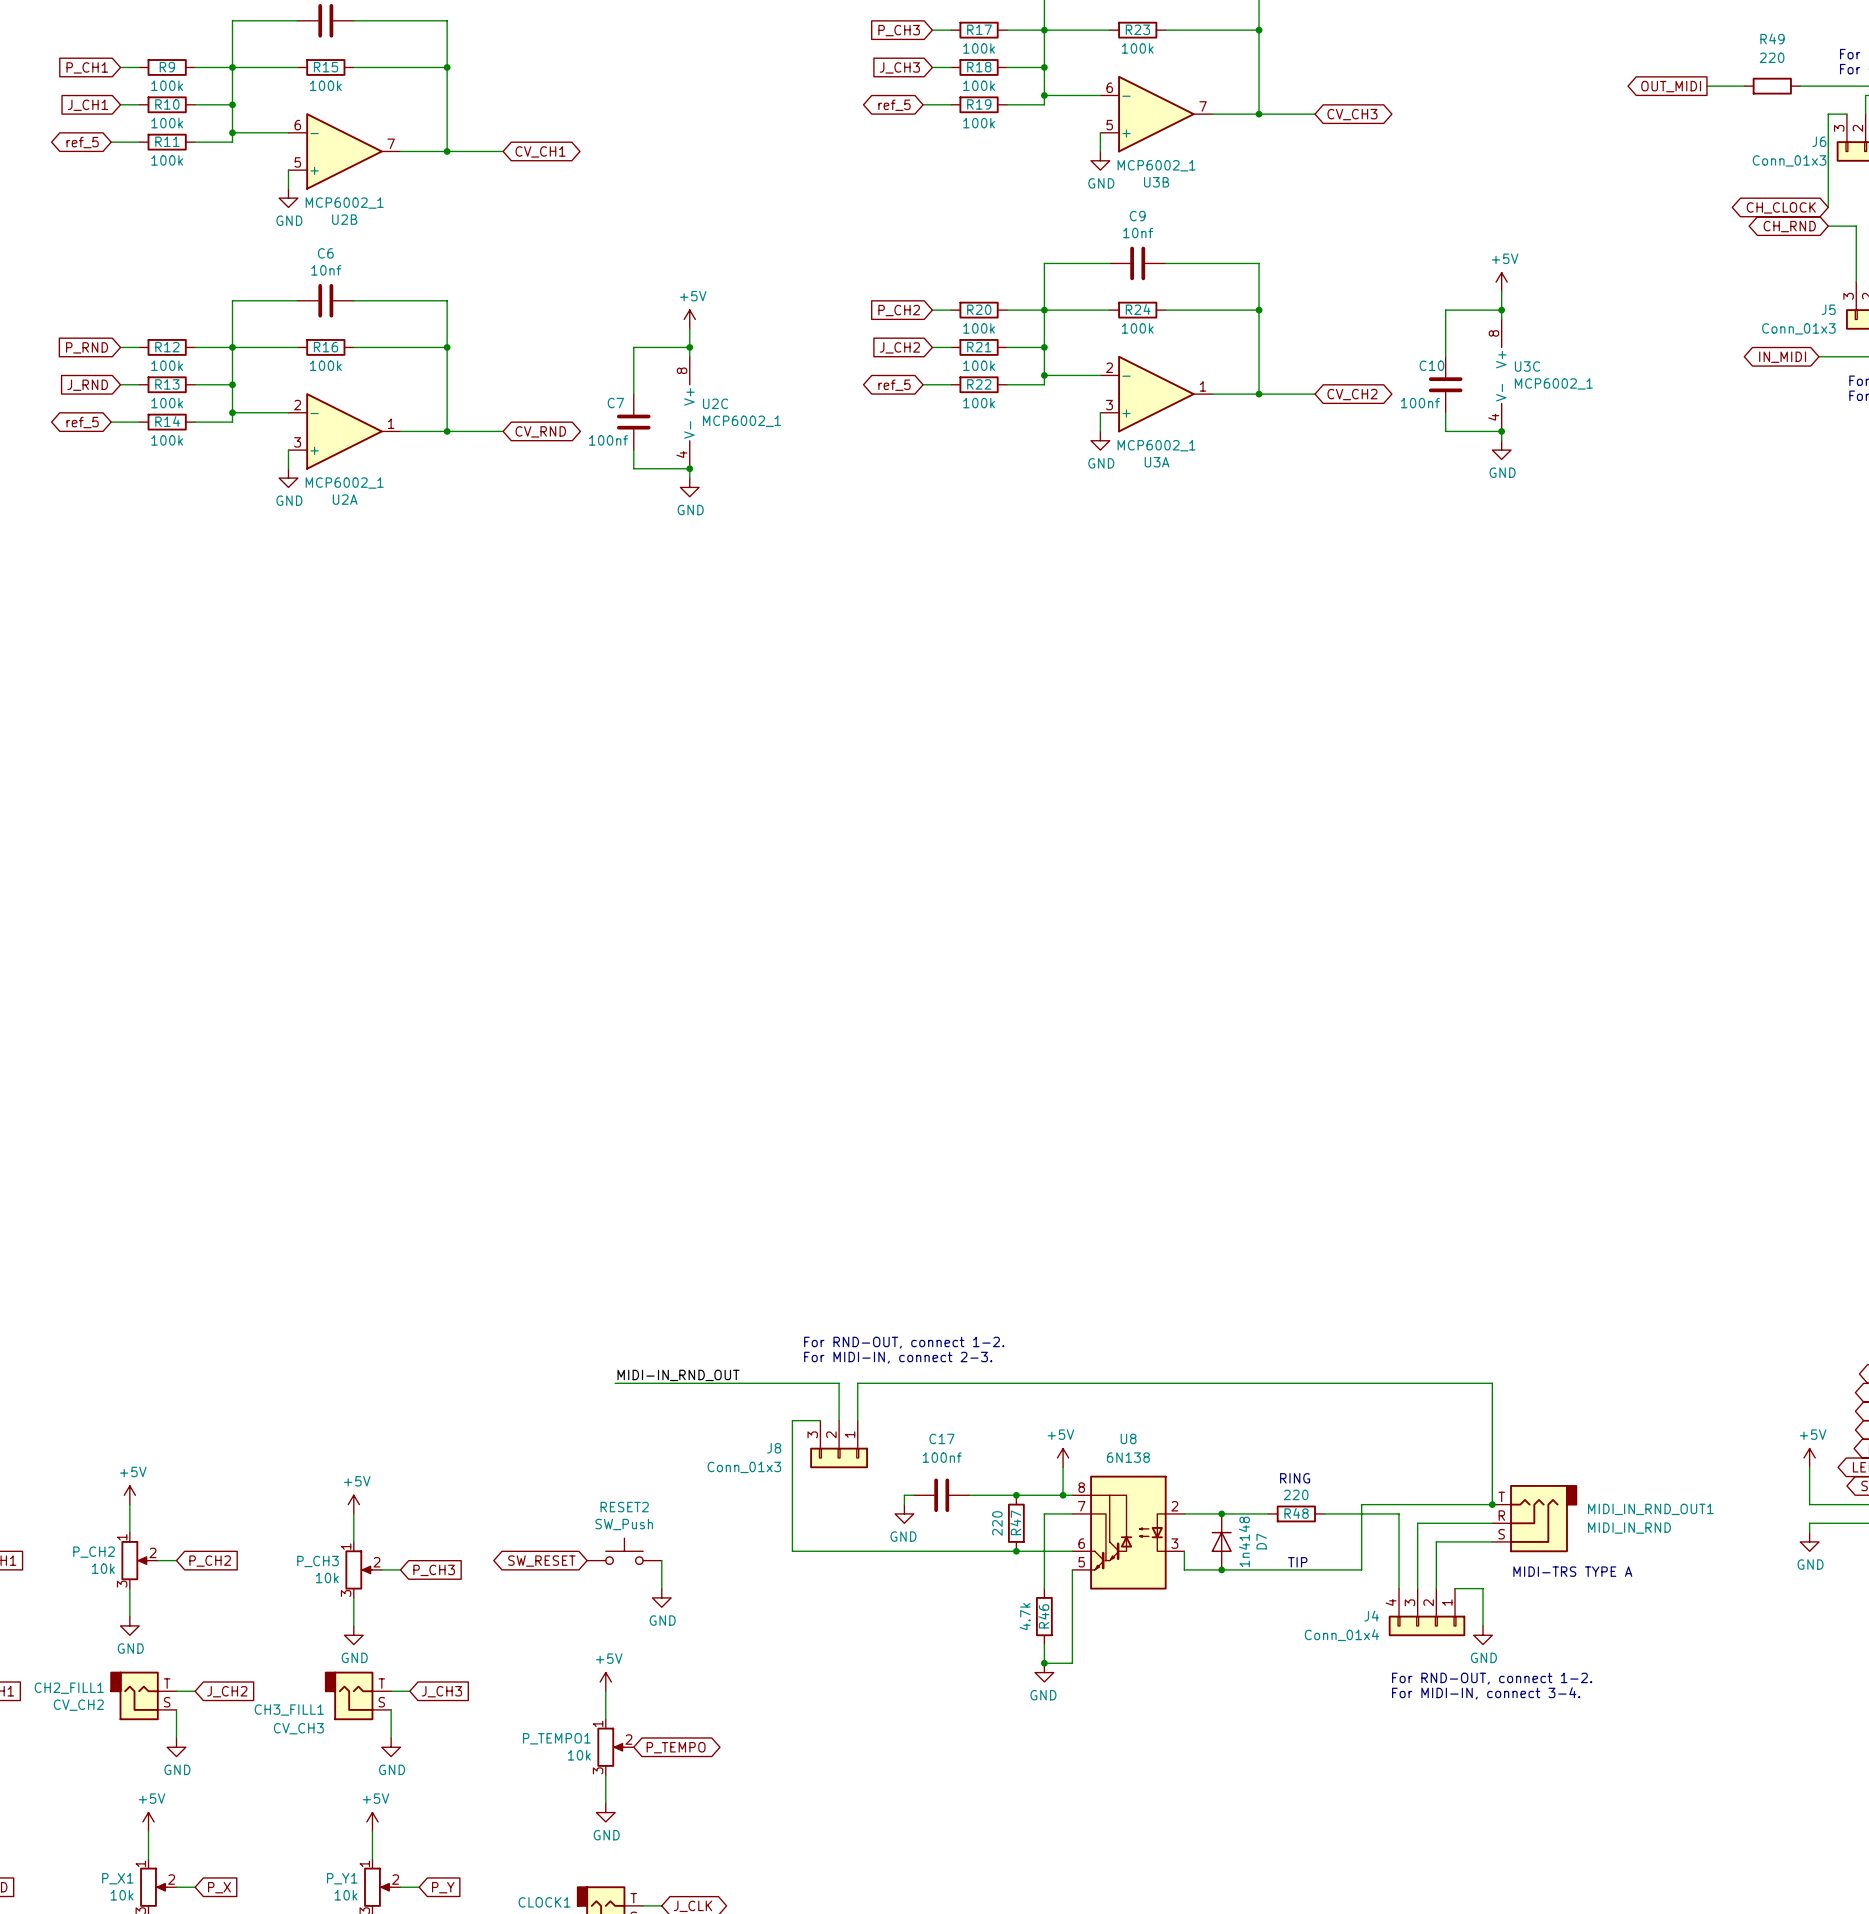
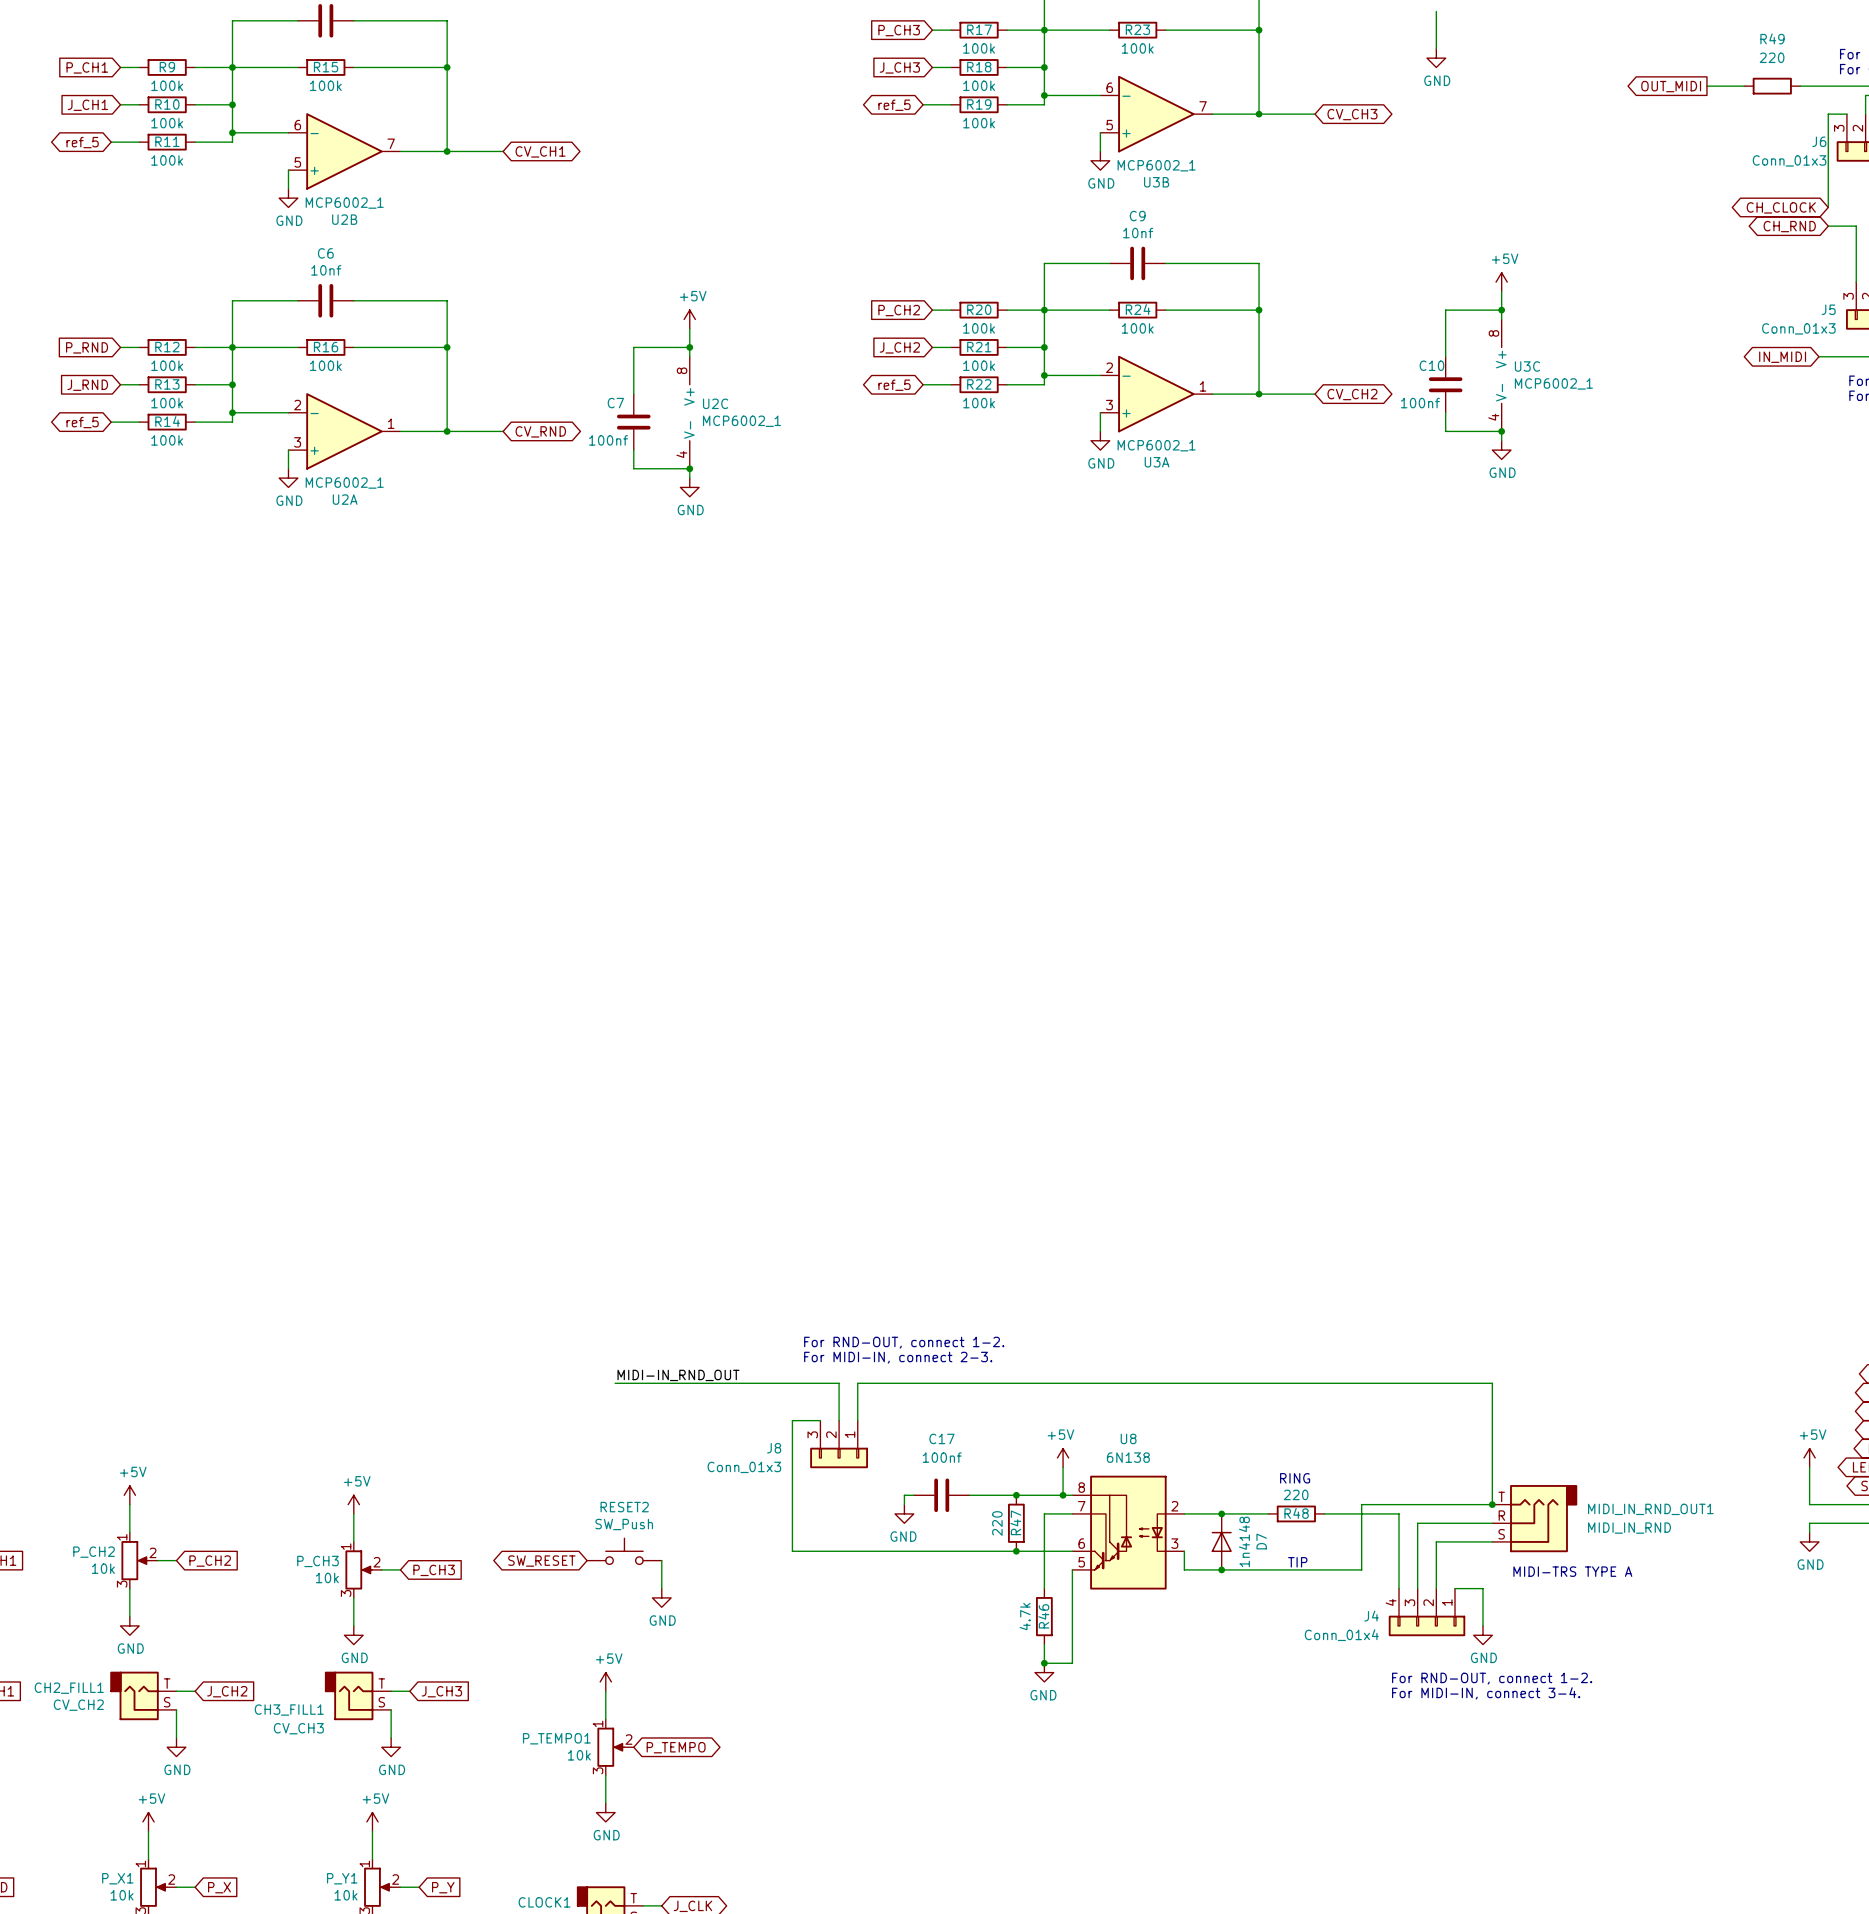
wire: none -> (1436, 11) (1436, 48)
power symbol: none -> GND (1436, 58)

